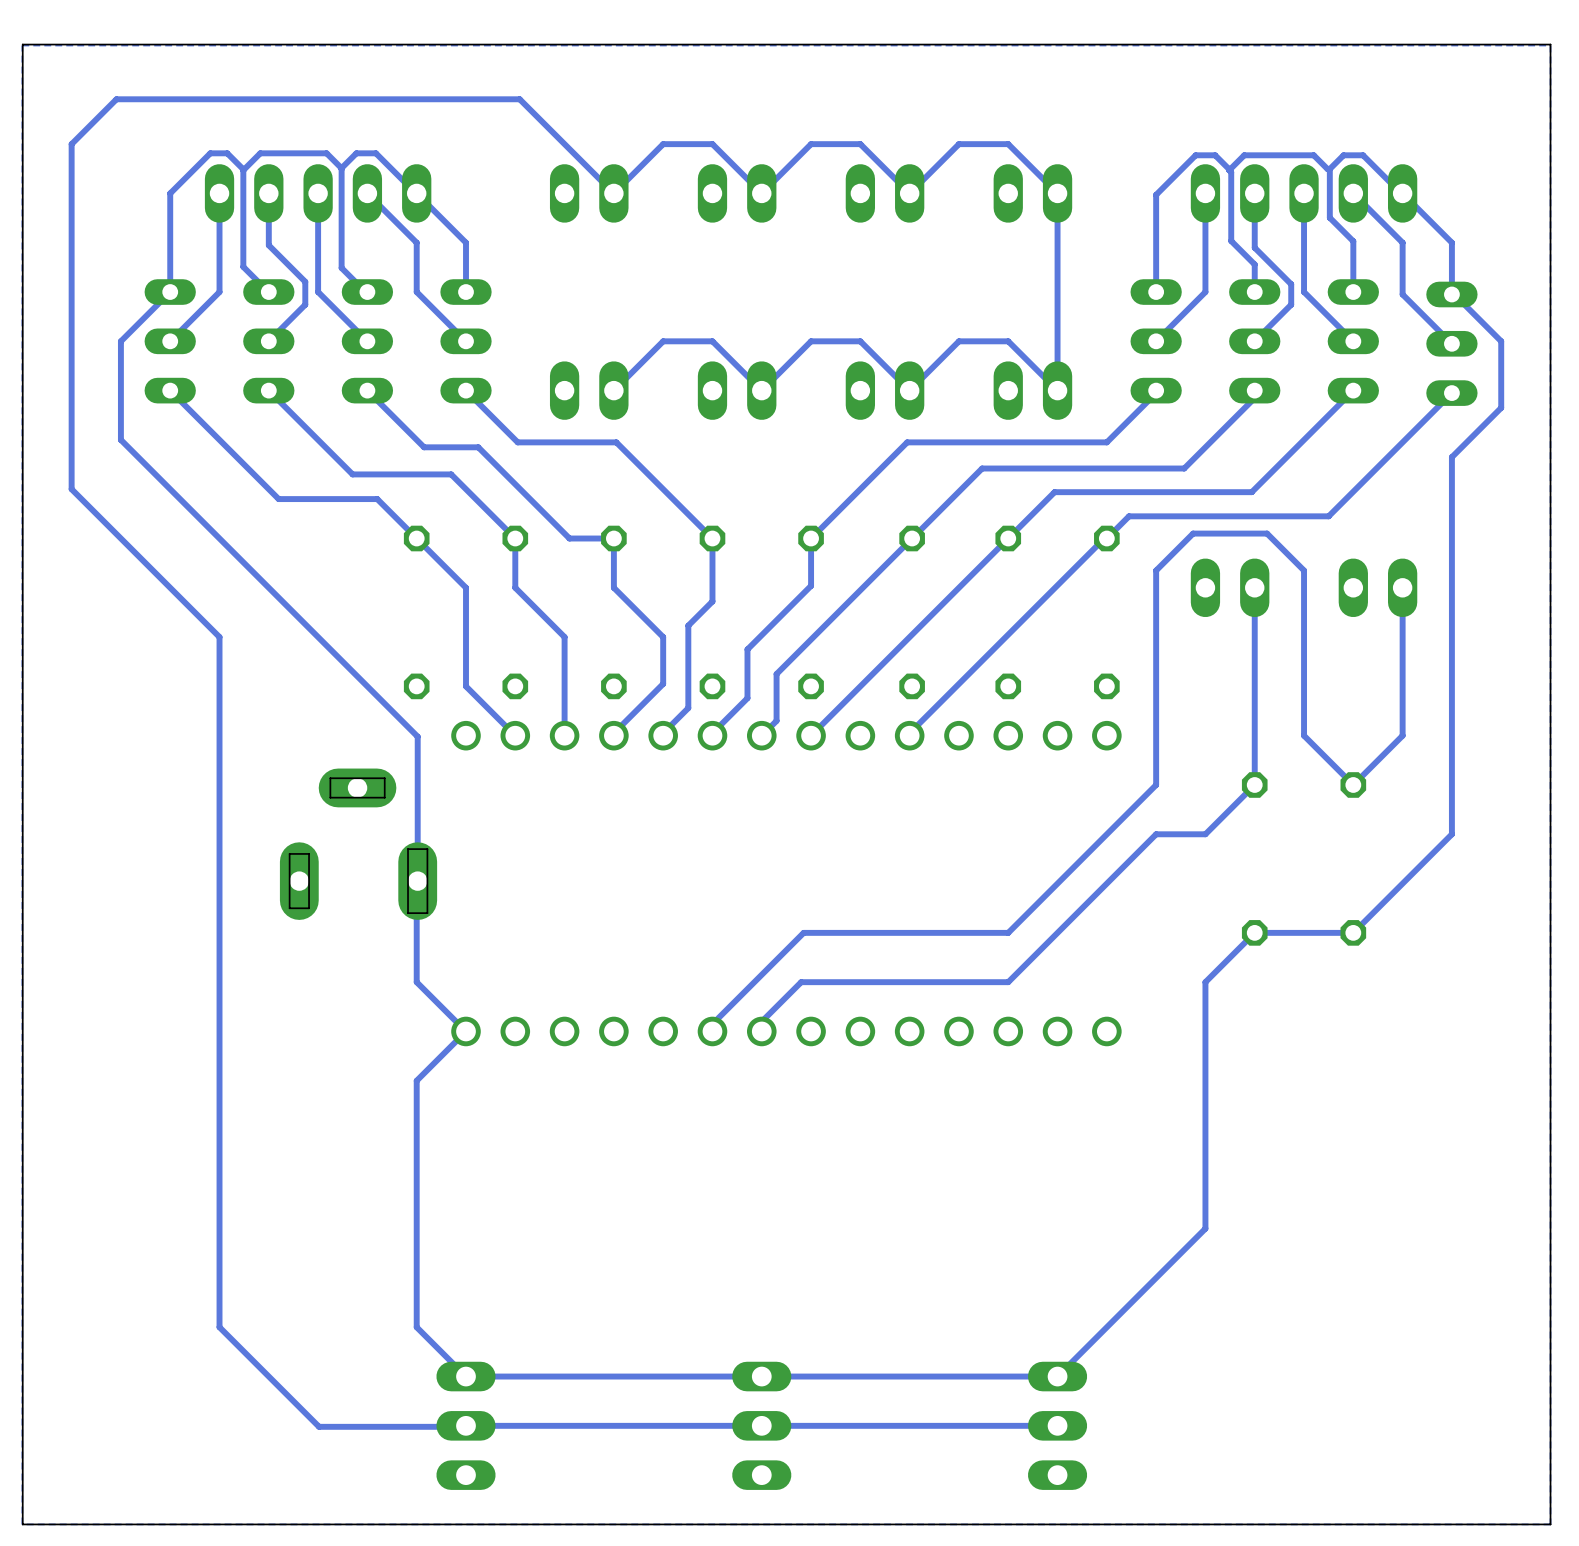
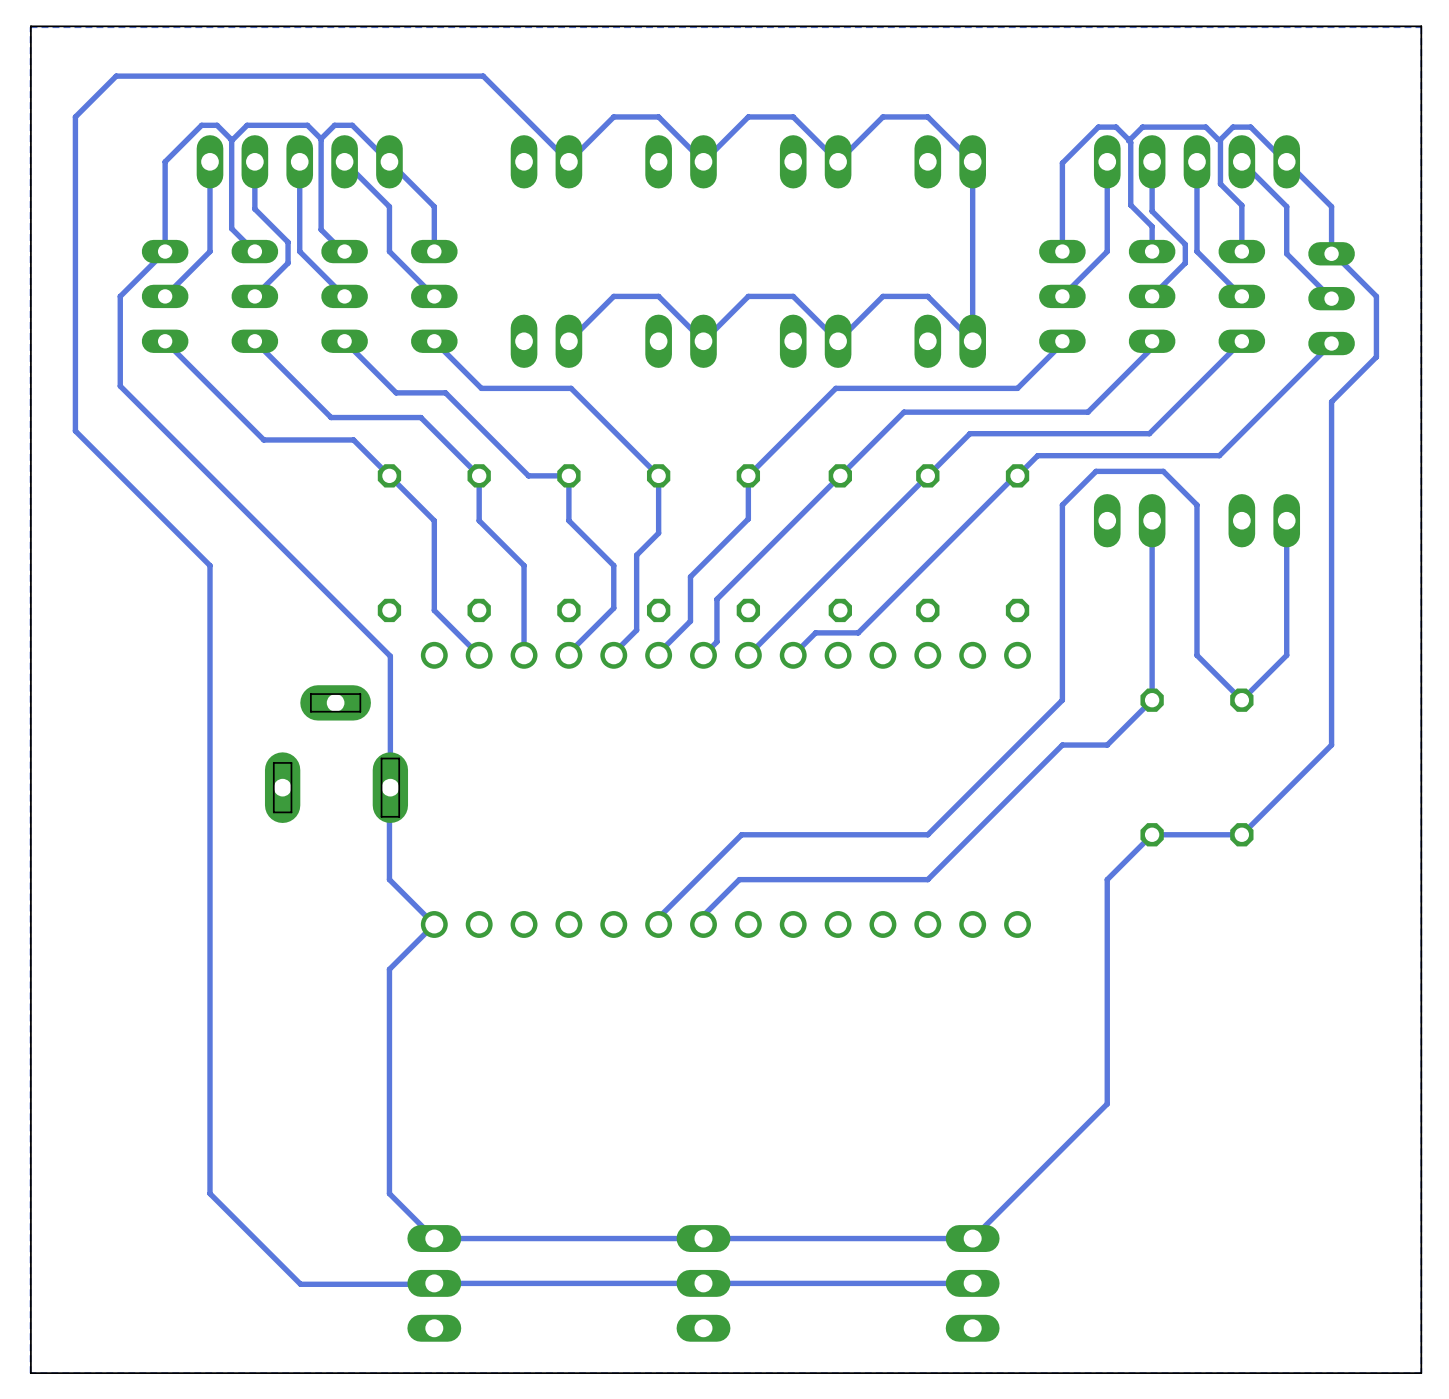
bottom track: (931, 711) (909, 733) (909, 735) -> (858, 632) (815, 632) (793, 655)

